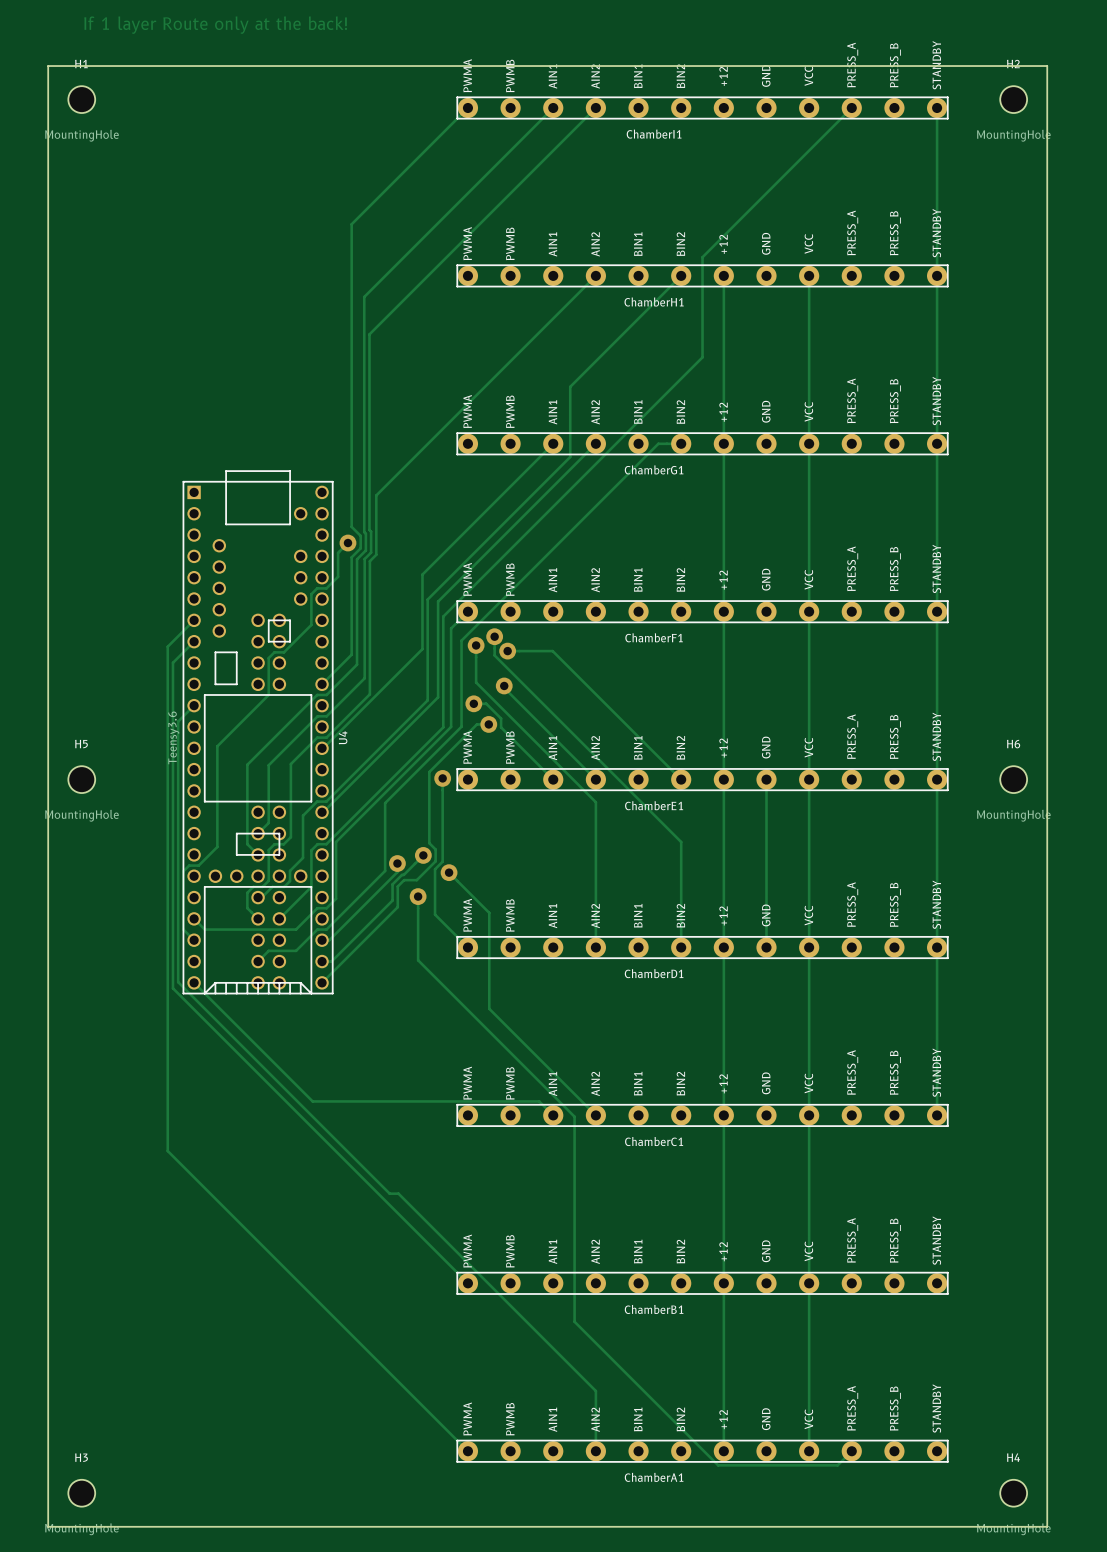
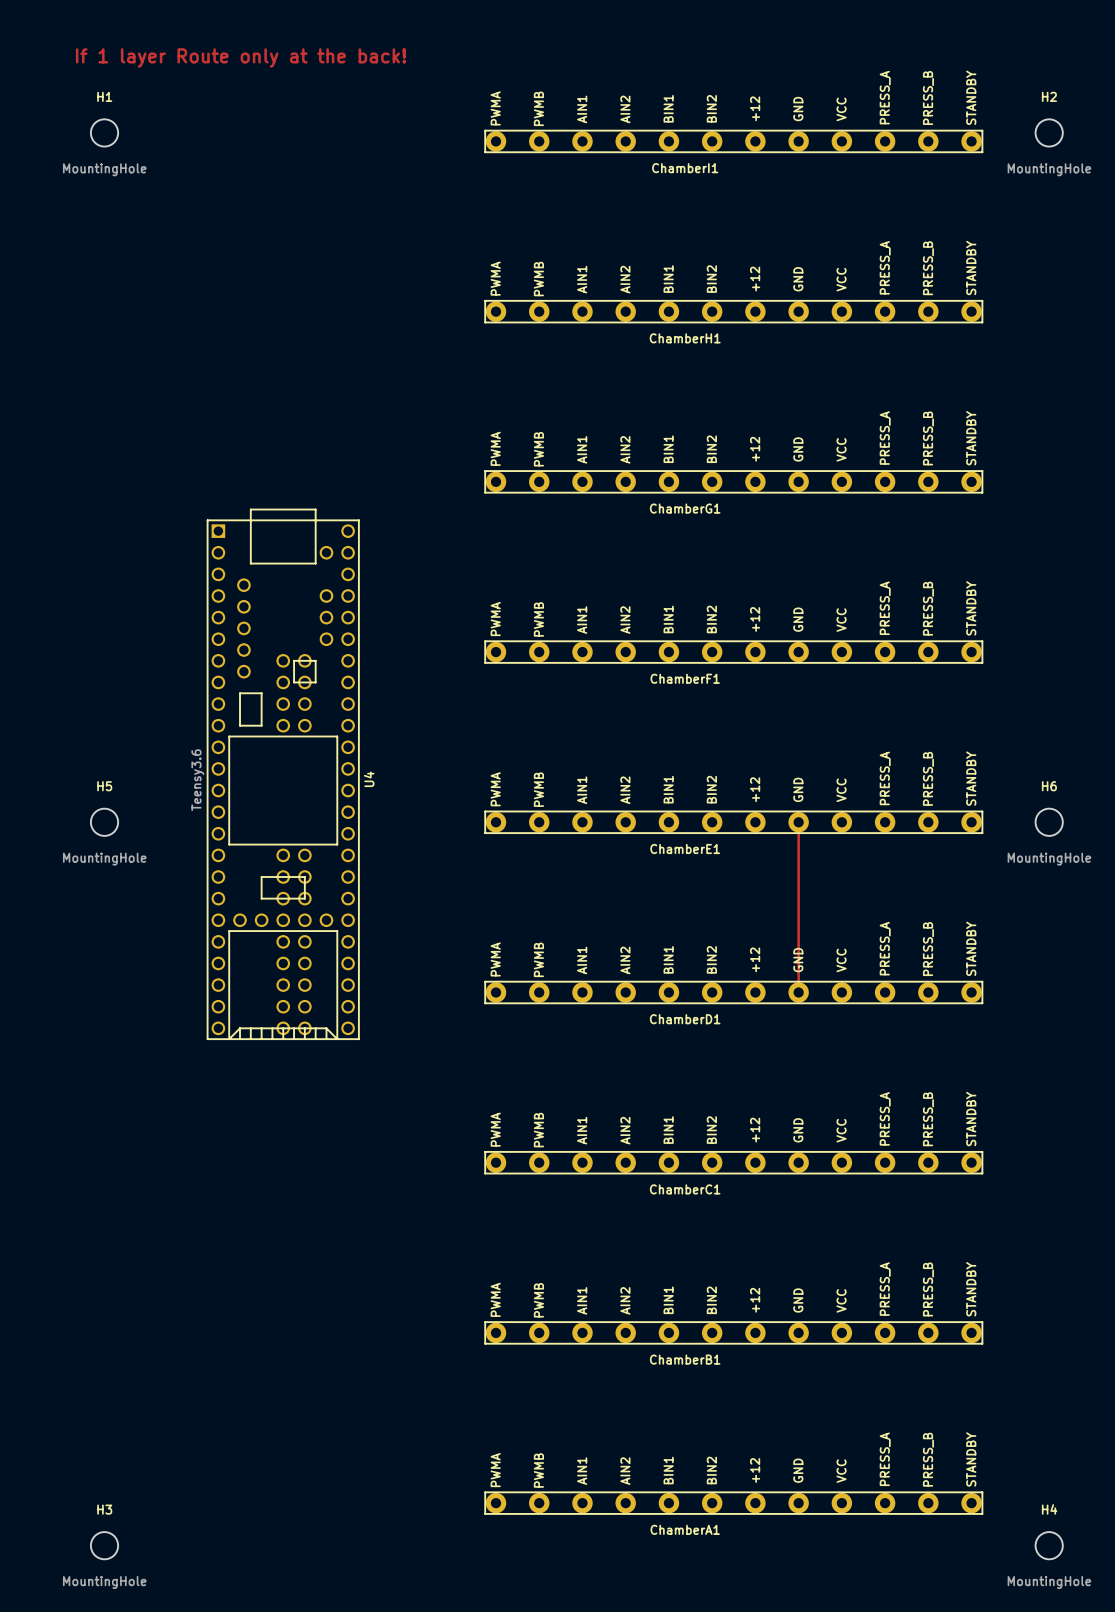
board edge: (48, 66) (48, 1526) (1047, 1526) (1047, 66) (48, 66) -> none
track: (467, 107) (351, 224) (351, 526) (360, 535) (360, 548) (351, 557) (351, 654) (322, 684) -> none
track: (553, 107) (364, 296) (364, 532) (365, 550) (357, 559) (357, 664) (326, 694) (317, 694) (247, 764) (247, 844) (258, 854) -> none
track: (595, 107) (369, 334) (371, 552) (364, 559) (364, 678) (326, 716) (317, 716) (268, 765) (268, 822) (258, 833) -> none
track: (851, 107) (702, 257) (702, 357) (443, 616) (443, 727) (326, 844) (317, 844) (311, 850) (311, 886) (279, 918) -> none
track: (937, 107) (937, 1115) -> none
track: (595, 275) (376, 495) (376, 554) (369, 561) (369, 694) (326, 737) (317, 737) (290, 764) (290, 837) (283, 844) (274, 844) (268, 850) (268, 880) (262, 886) (253, 886) (247, 892) (247, 908) (258, 918) -> none
track: (681, 275) (570, 386) (570, 457) (427, 599) (427, 700) (326, 801) (317, 801) (303, 815) (303, 857) (290, 870) (290, 881) (284, 886) (272, 886) (261, 897) (258, 897) -> none
track: (723, 275) (723, 1451) -> none
track: (809, 275) (809, 1451) -> none
track: (553, 443) (422, 574) (422, 649) (322, 748) -> none
track: (595, 443) (438, 601) (438, 697) (322, 812) -> none
track: (681, 443) (658, 443) (461, 640) (461, 726) (385, 803) (385, 870) (326, 929) (317, 929) (296, 950) (268, 950) (258, 961) -> none
track: (347, 543) (338, 552) (338, 576) (326, 588) (317, 588) (311, 594) (311, 624) (283, 652) (274, 652) (268, 658) (268, 694) (217, 746) (217, 846) (198, 865) (189, 865) (183, 871) (183, 929) (194, 940) -> none
via: (347, 543) -> none
track: (467, 611) (451, 628) (451, 726) (336, 841) (336, 898) (326, 908) (317, 908) (296, 929) (204, 929) (194, 918) -> none
track: (194, 620) (167, 646) (167, 1151) (467, 1451) -> none
track: (494, 636) (494, 655) (681, 842) (681, 947) -> none
via: (494, 636) -> none
track: (194, 641) (172, 662) (172, 988) (467, 1283) -> none
track: (476, 645) (476, 682) (595, 802) (595, 947) -> none
via: (476, 645) -> none
track: (507, 651) (552, 651) (681, 779) -> none
via: (507, 651) -> none
track: (504, 685) (595, 779) -> none
via: (504, 685) -> none
track: (473, 703) (486, 703) (501, 718) (501, 727) (553, 779) -> none
via: (473, 703) -> none
track: (194, 705) (178, 721) (178, 982) (389, 1193) (398, 1193) (595, 1391) (595, 1451) -> none
track: (488, 724) (476, 724) (429, 772) (429, 843) (435, 849) (435, 861) (416, 880) (404, 880) (397, 886) (397, 907) (322, 982) -> none
via: (488, 724) -> none
track: (442, 778) (442, 861) (435, 869) (435, 914) (467, 947) -> none
via: (442, 778) -> none
track: (423, 855) (392, 884) (392, 900) (331, 961) (322, 961) -> none
via: (423, 855) -> none
track: (397, 863) (397, 872) (329, 940) (322, 940) -> none
via: (397, 863) -> none
track: (449, 872) (489, 912) (489, 1008) (595, 1115) -> none
via: (449, 872) -> none
track: (418, 896) (418, 960) (574, 1116) (574, 1321) (718, 1465) (837, 1465) (851, 1451) -> none
via: (418, 896) -> none
track: (194, 982) (312, 1101) (539, 1101) (553, 1115) -> none

